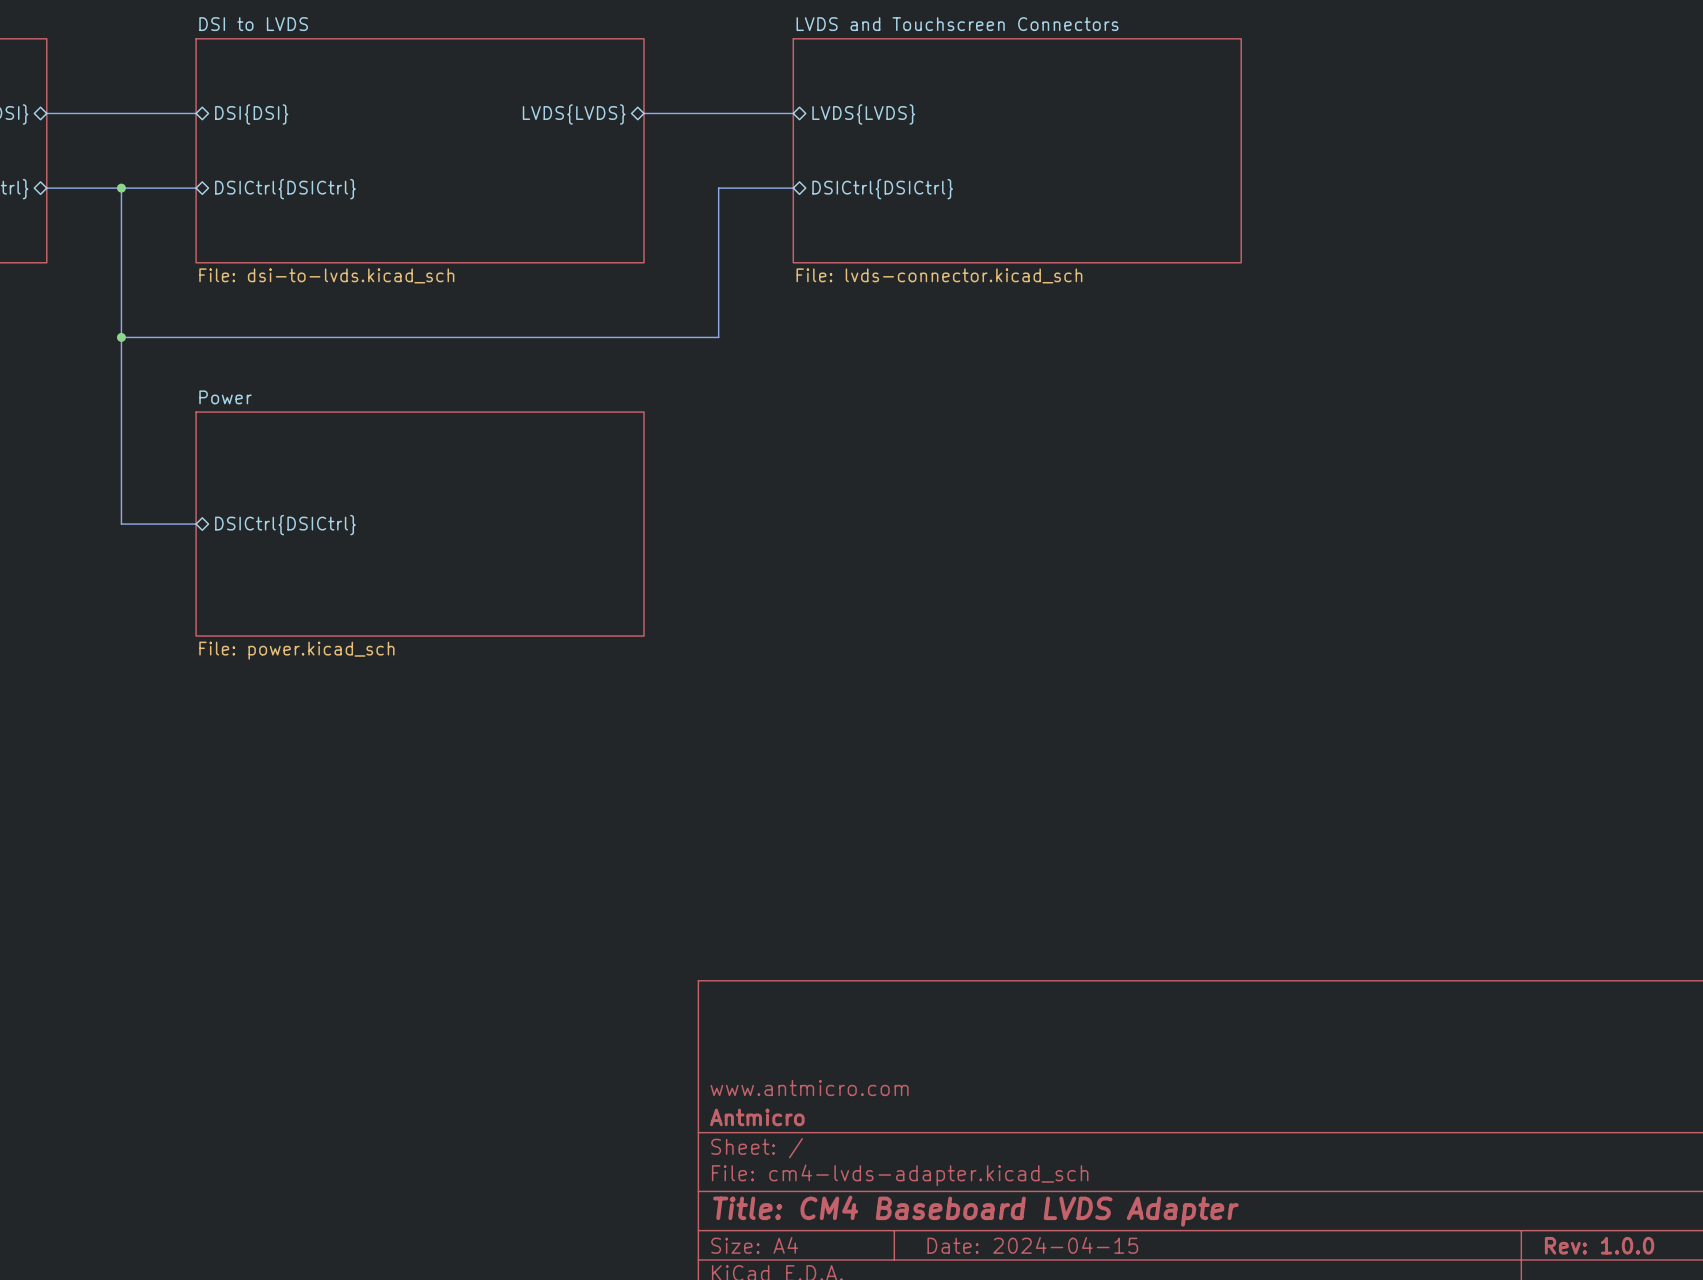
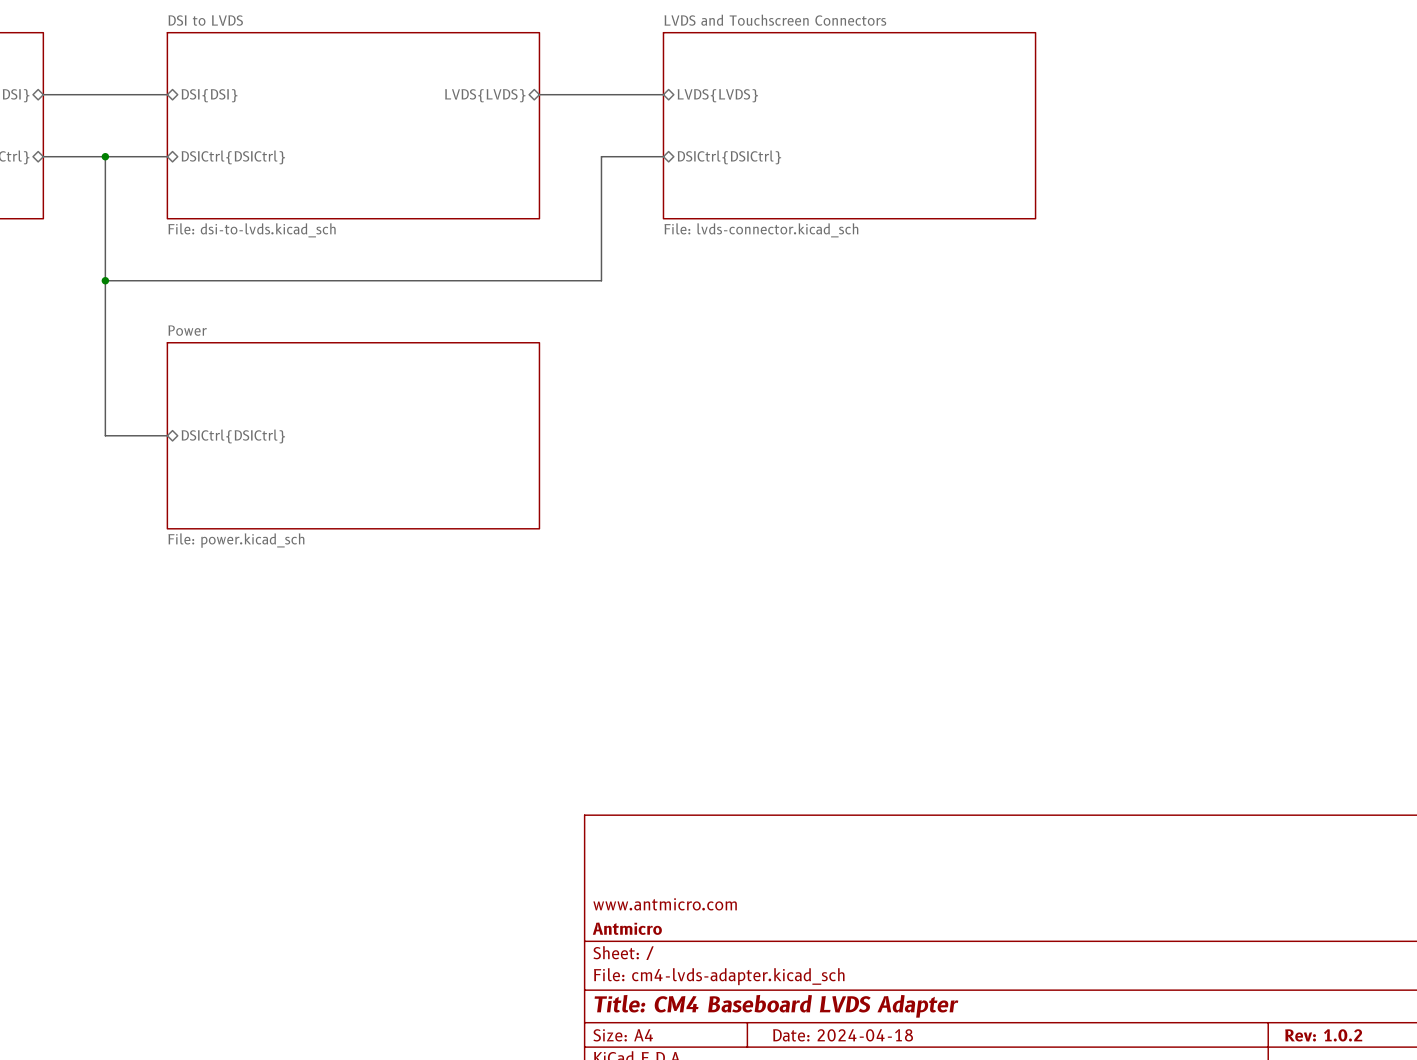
title block: Date: 2024-04-15 (1032, 1245) -> Date: 2024-04-18 (843, 1035)
title block: Rev: 1.0.0 (1599, 1245) -> Rev: 1.0.2 (1323, 1035)

